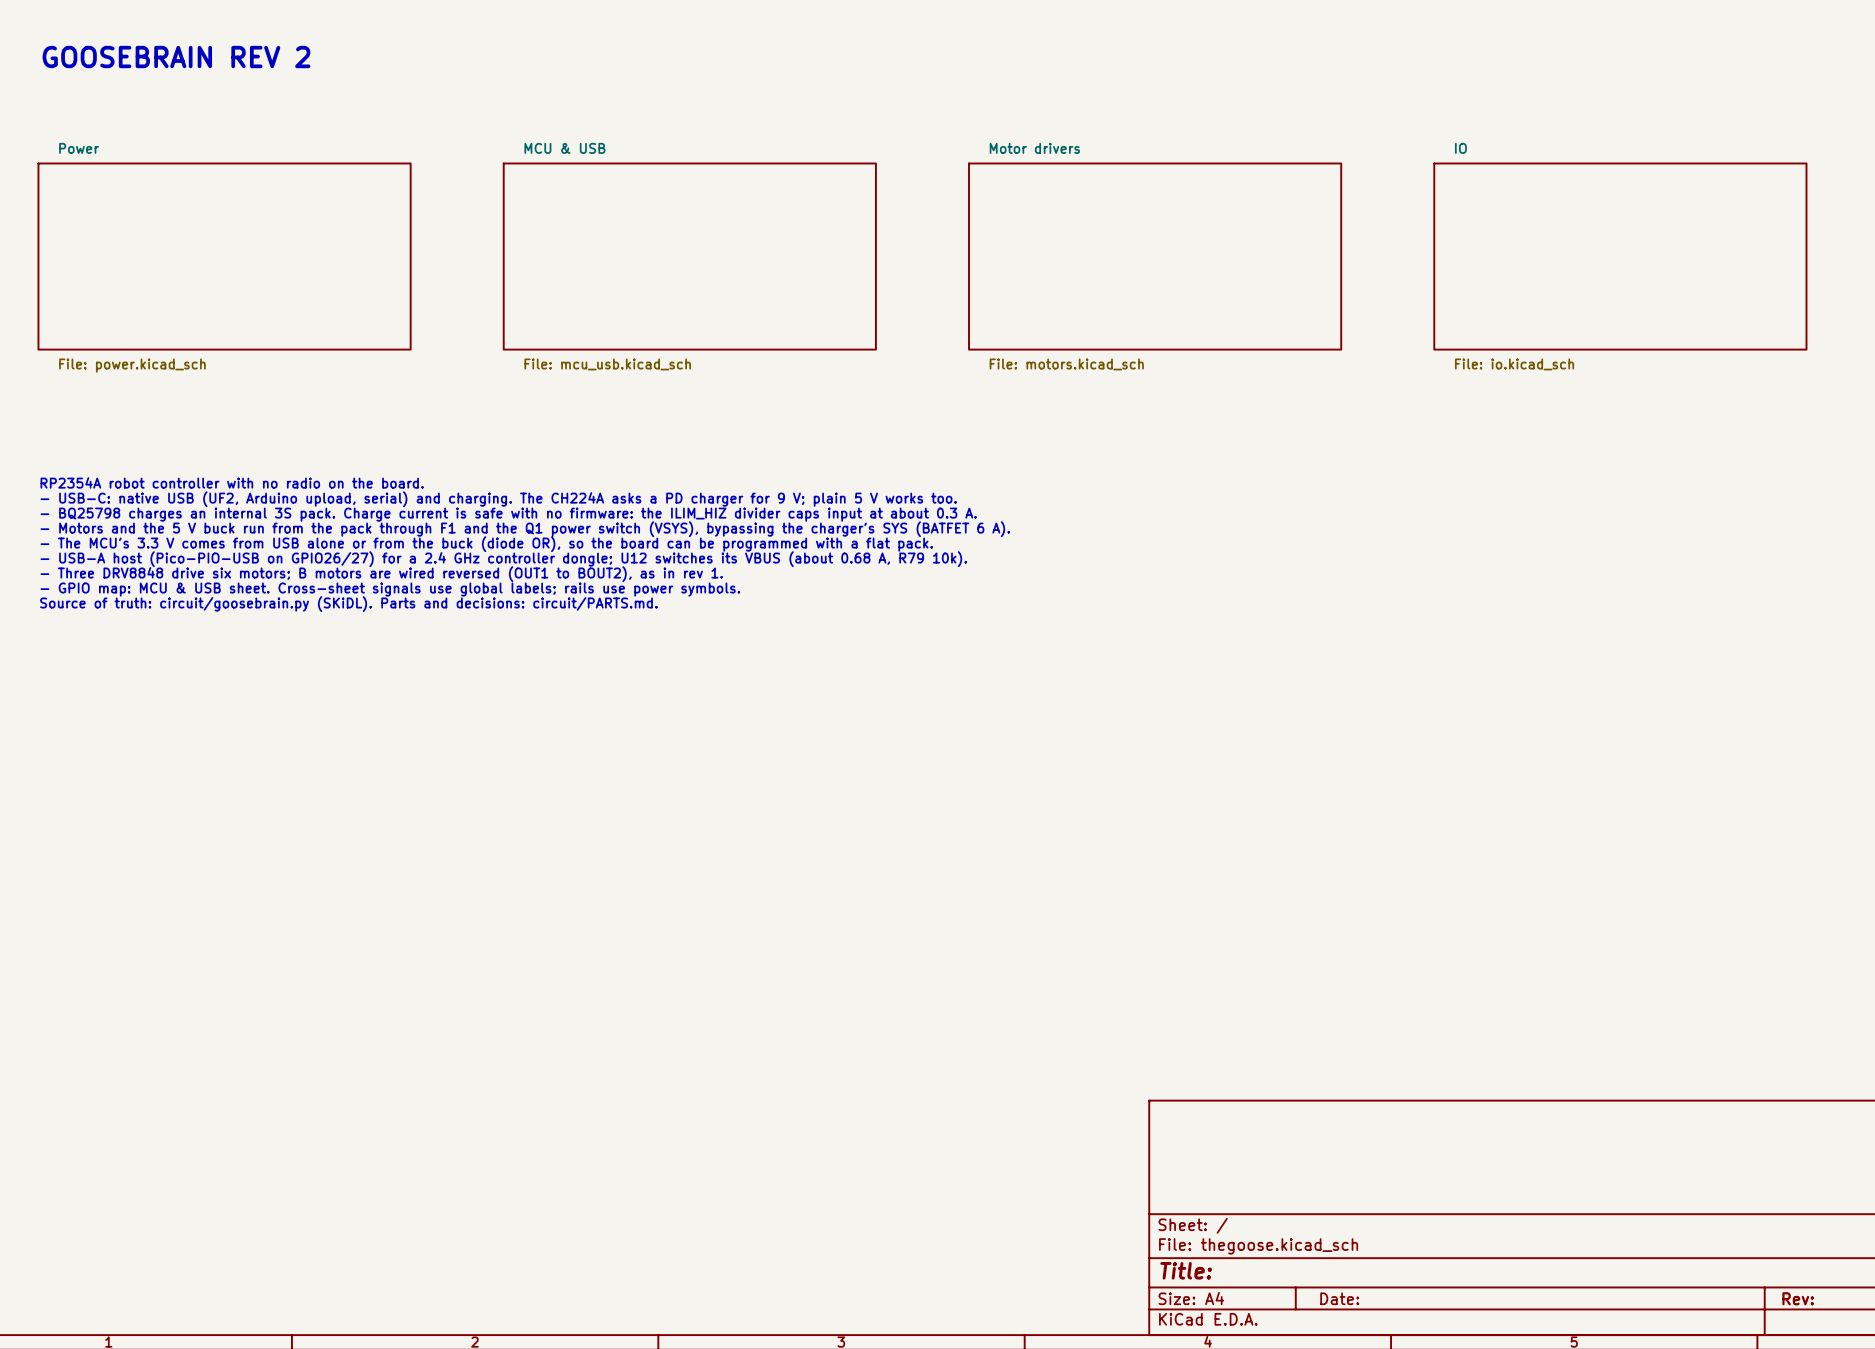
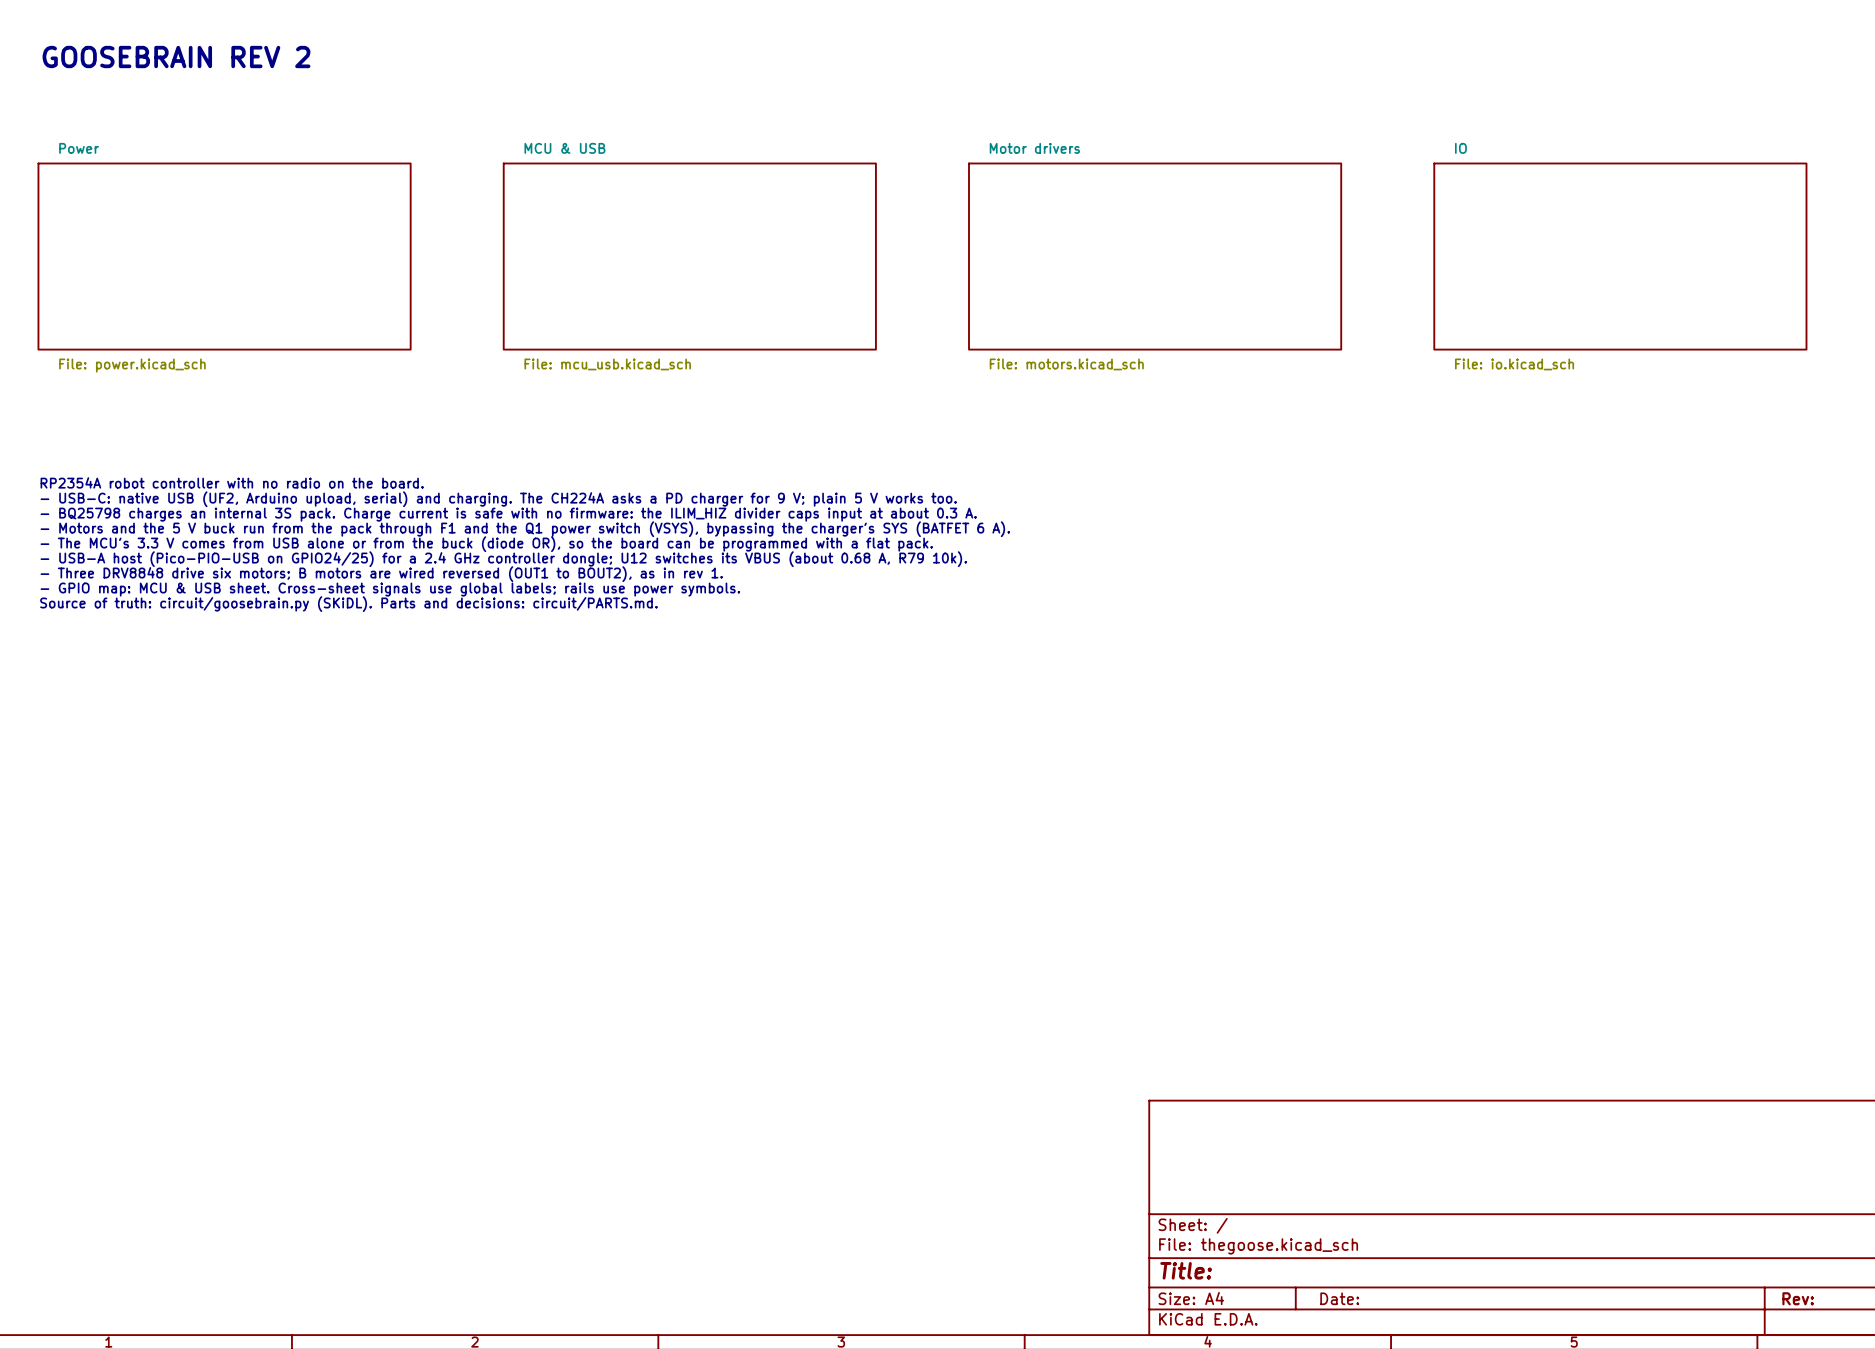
text: - USB-A host (Pico-PIO-USB on GPIO26/27) for a 2.4 GHz controller dongle; U12 switches its VBUS (about 0.68 A, R79 10k). (503, 559) -> - USB-A host (Pico-PIO-USB on GPIO24/25) for a 2.4 GHz controller dongle; U12 switches its VBUS (about 0.68 A, R79 10k). (503, 559)

